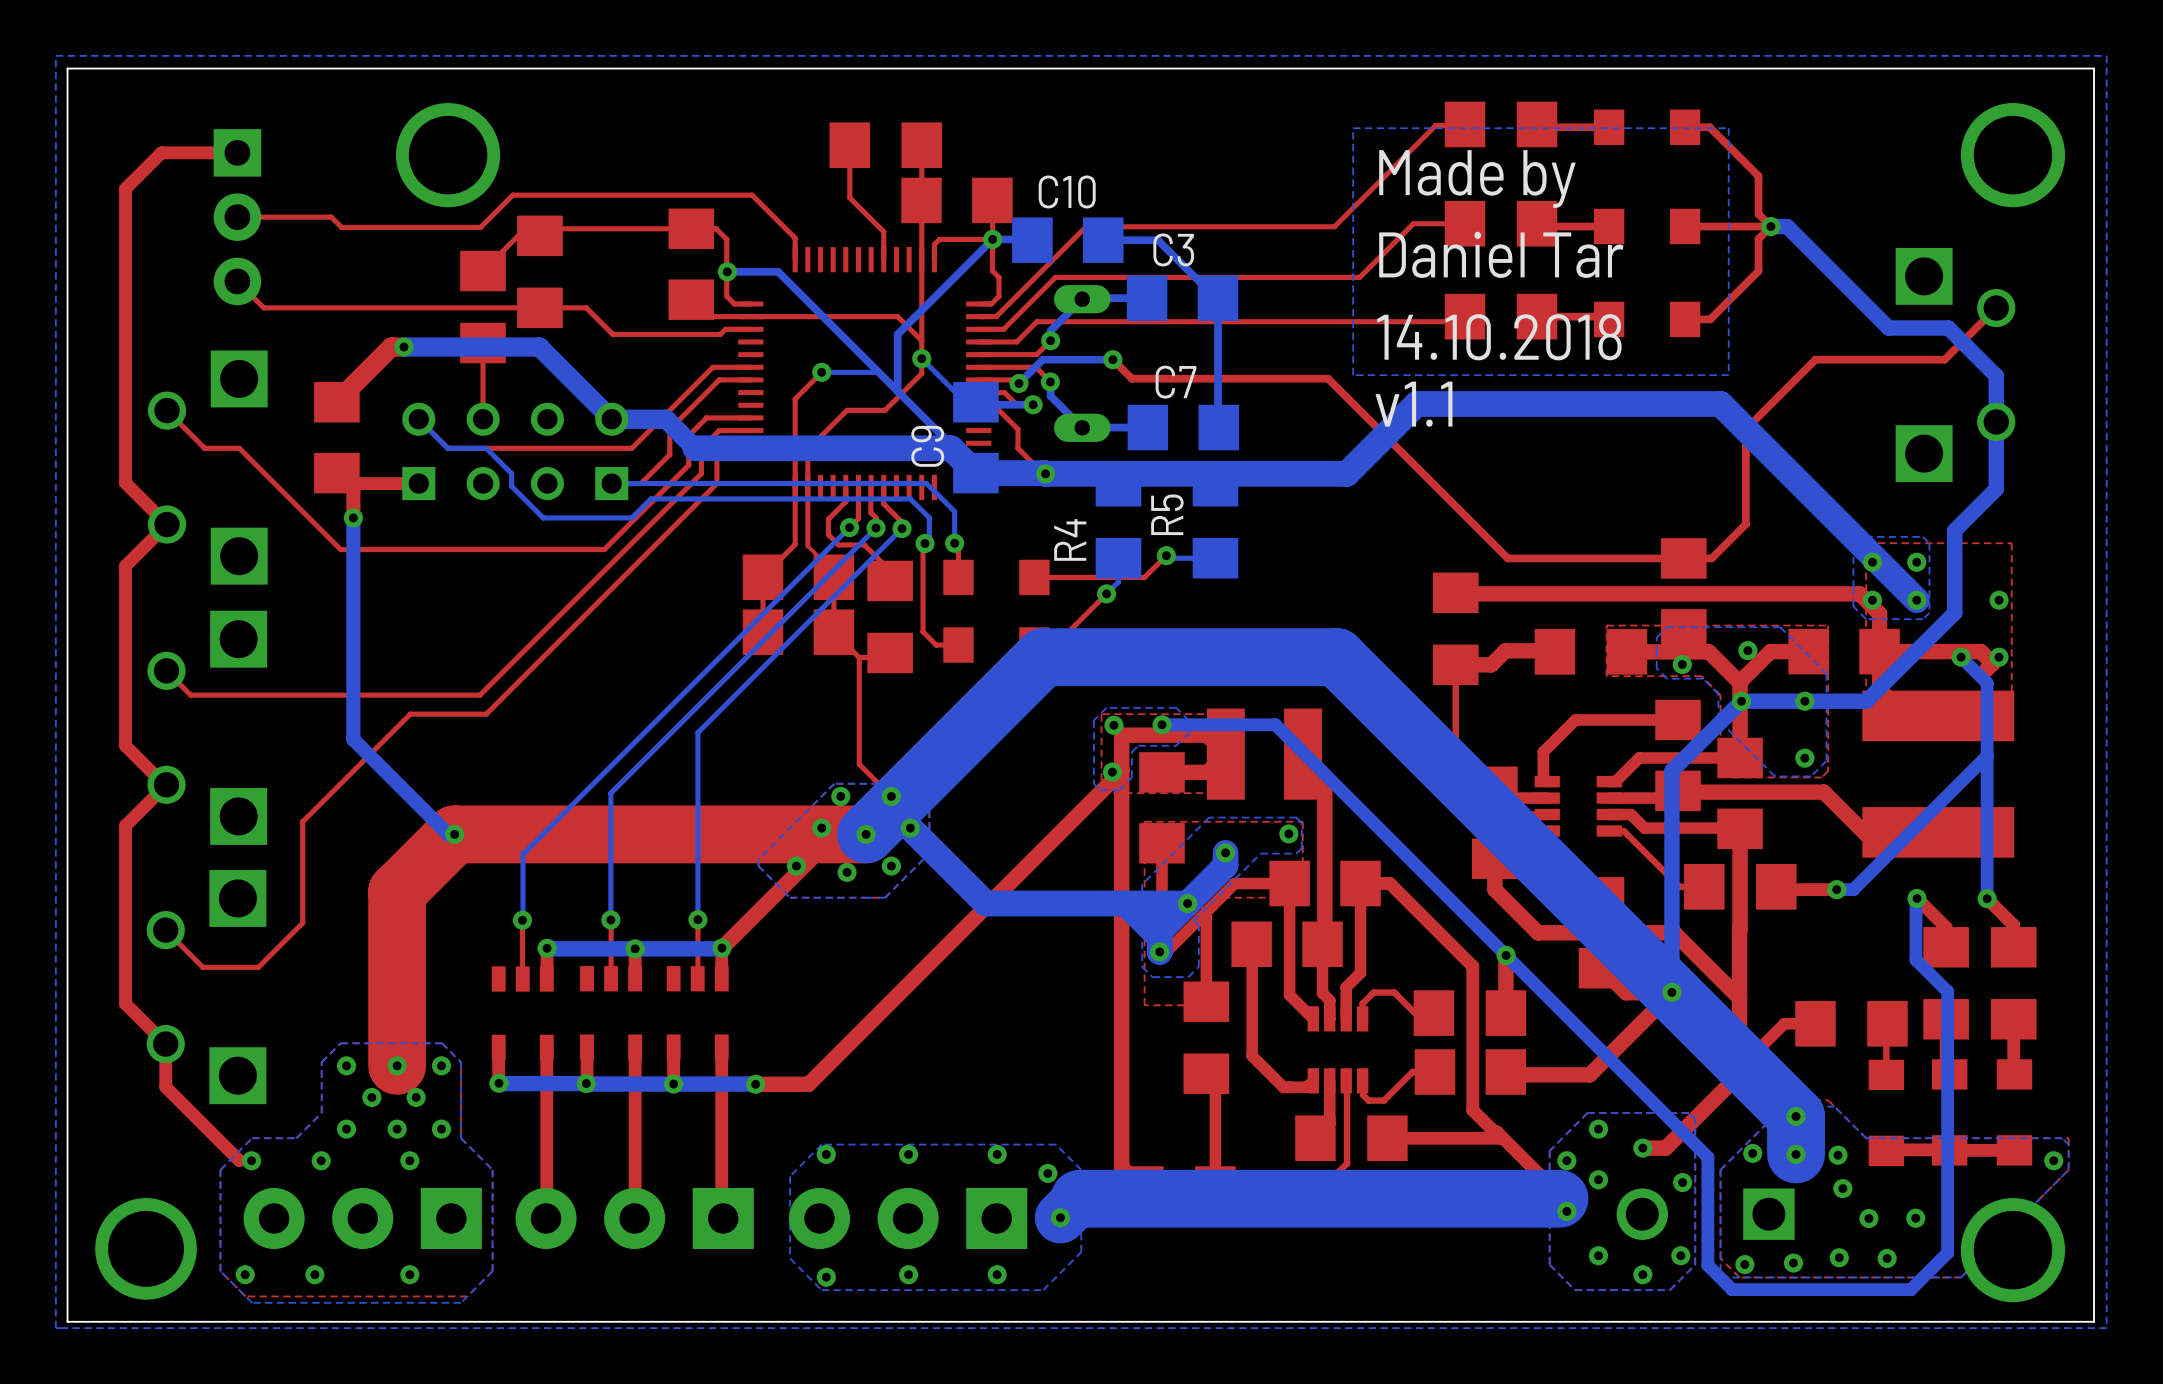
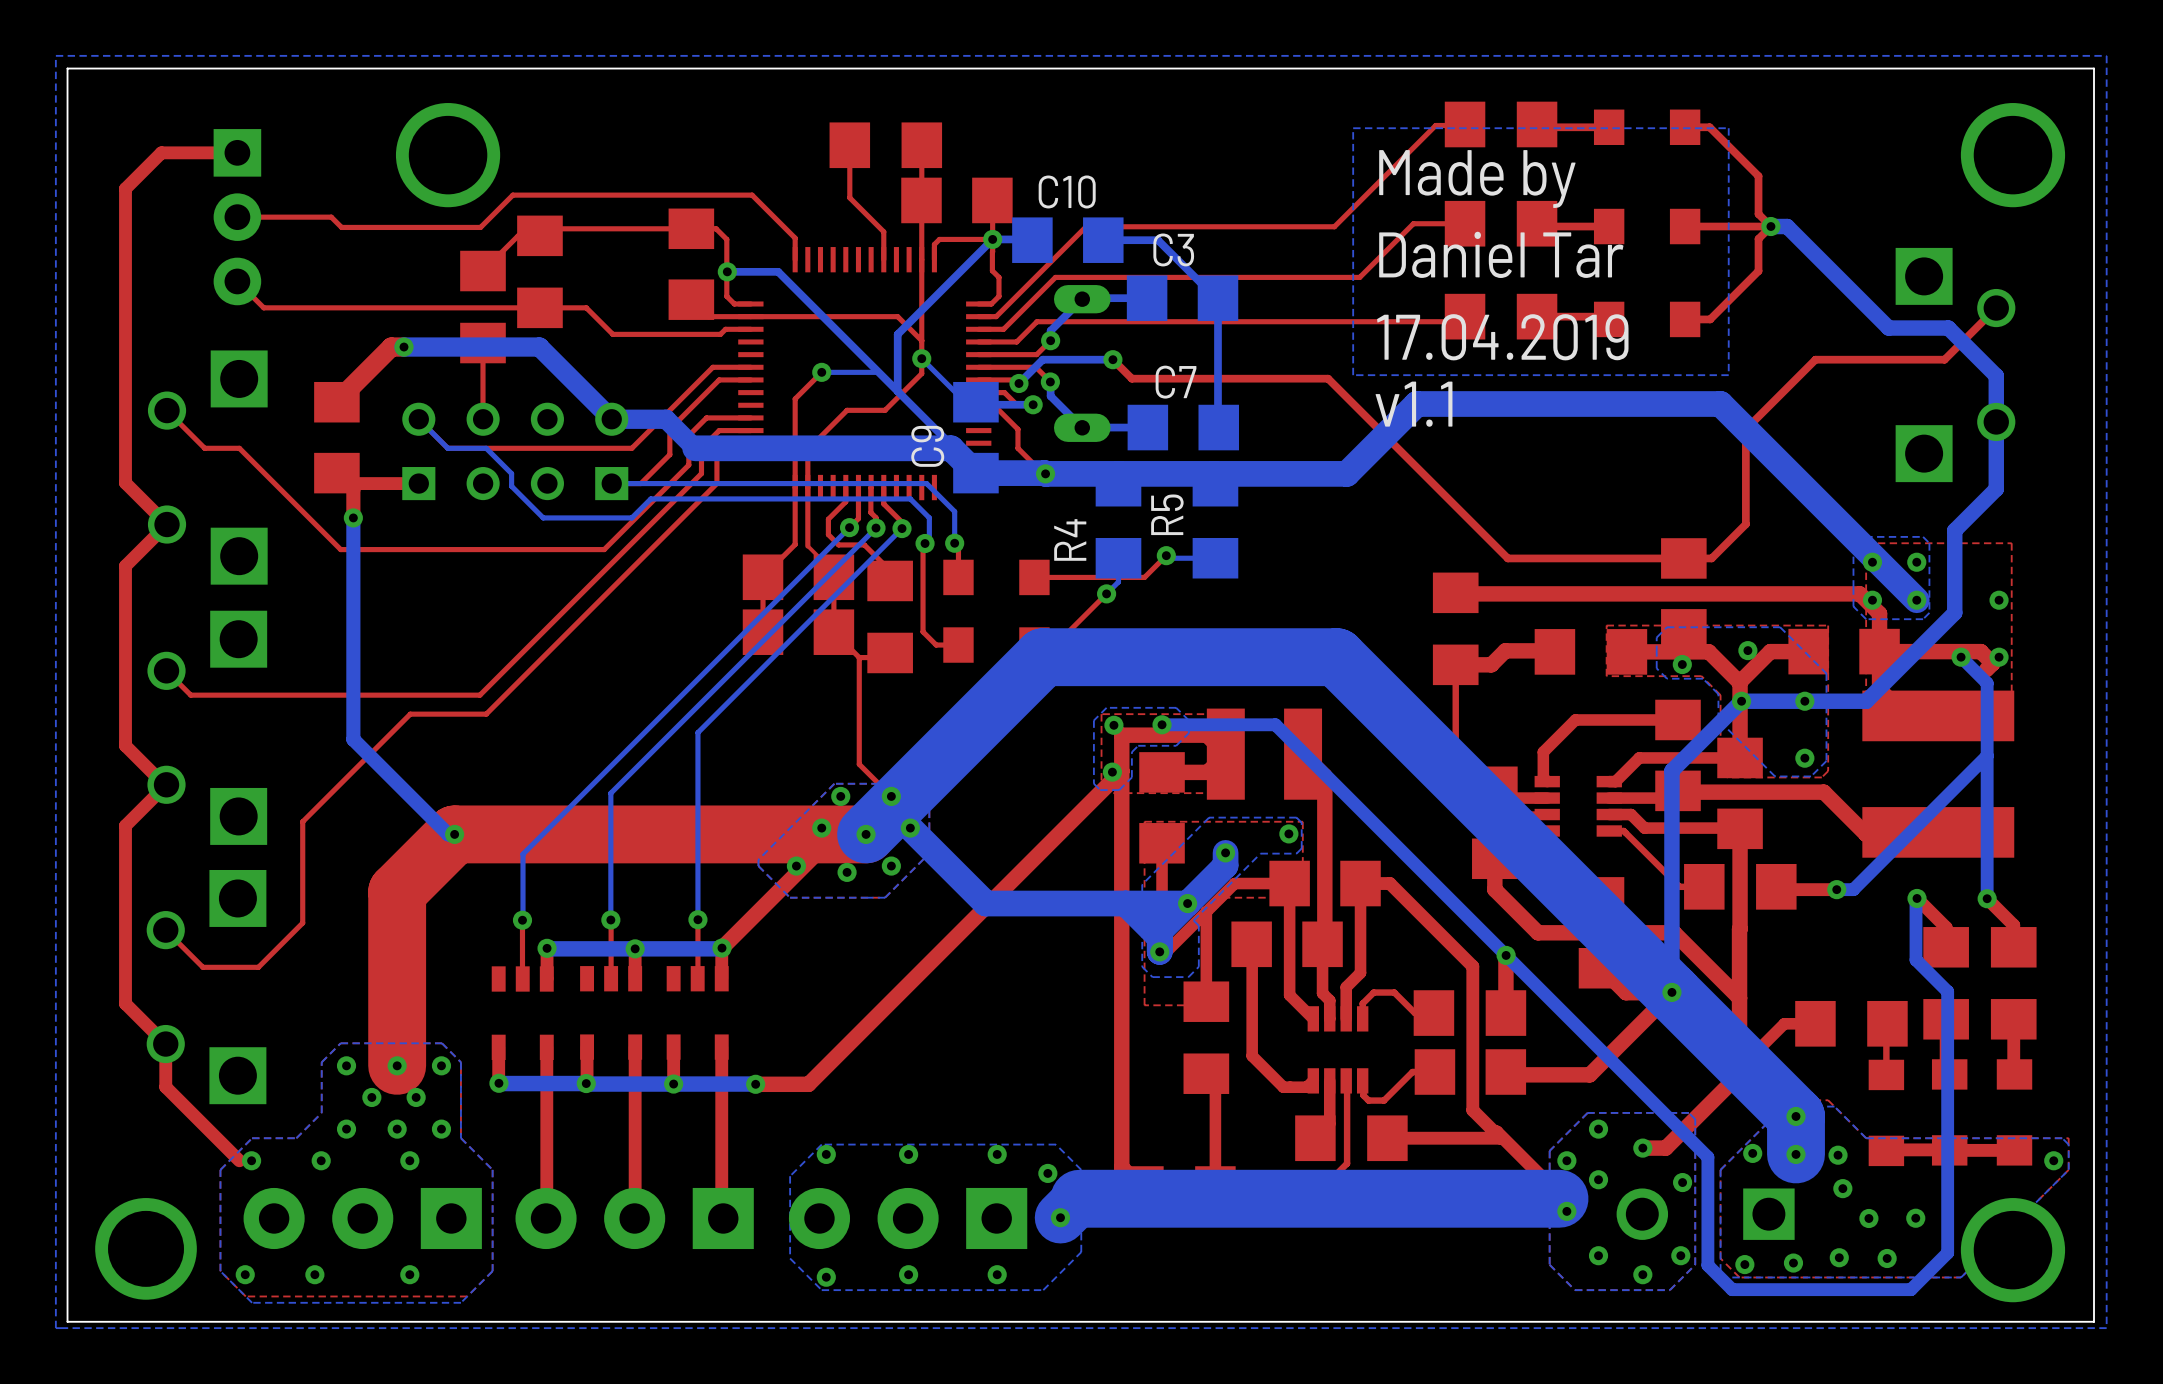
text: 14.10.2018 (1499, 337) -> 17.04.2019 (1502, 337)

